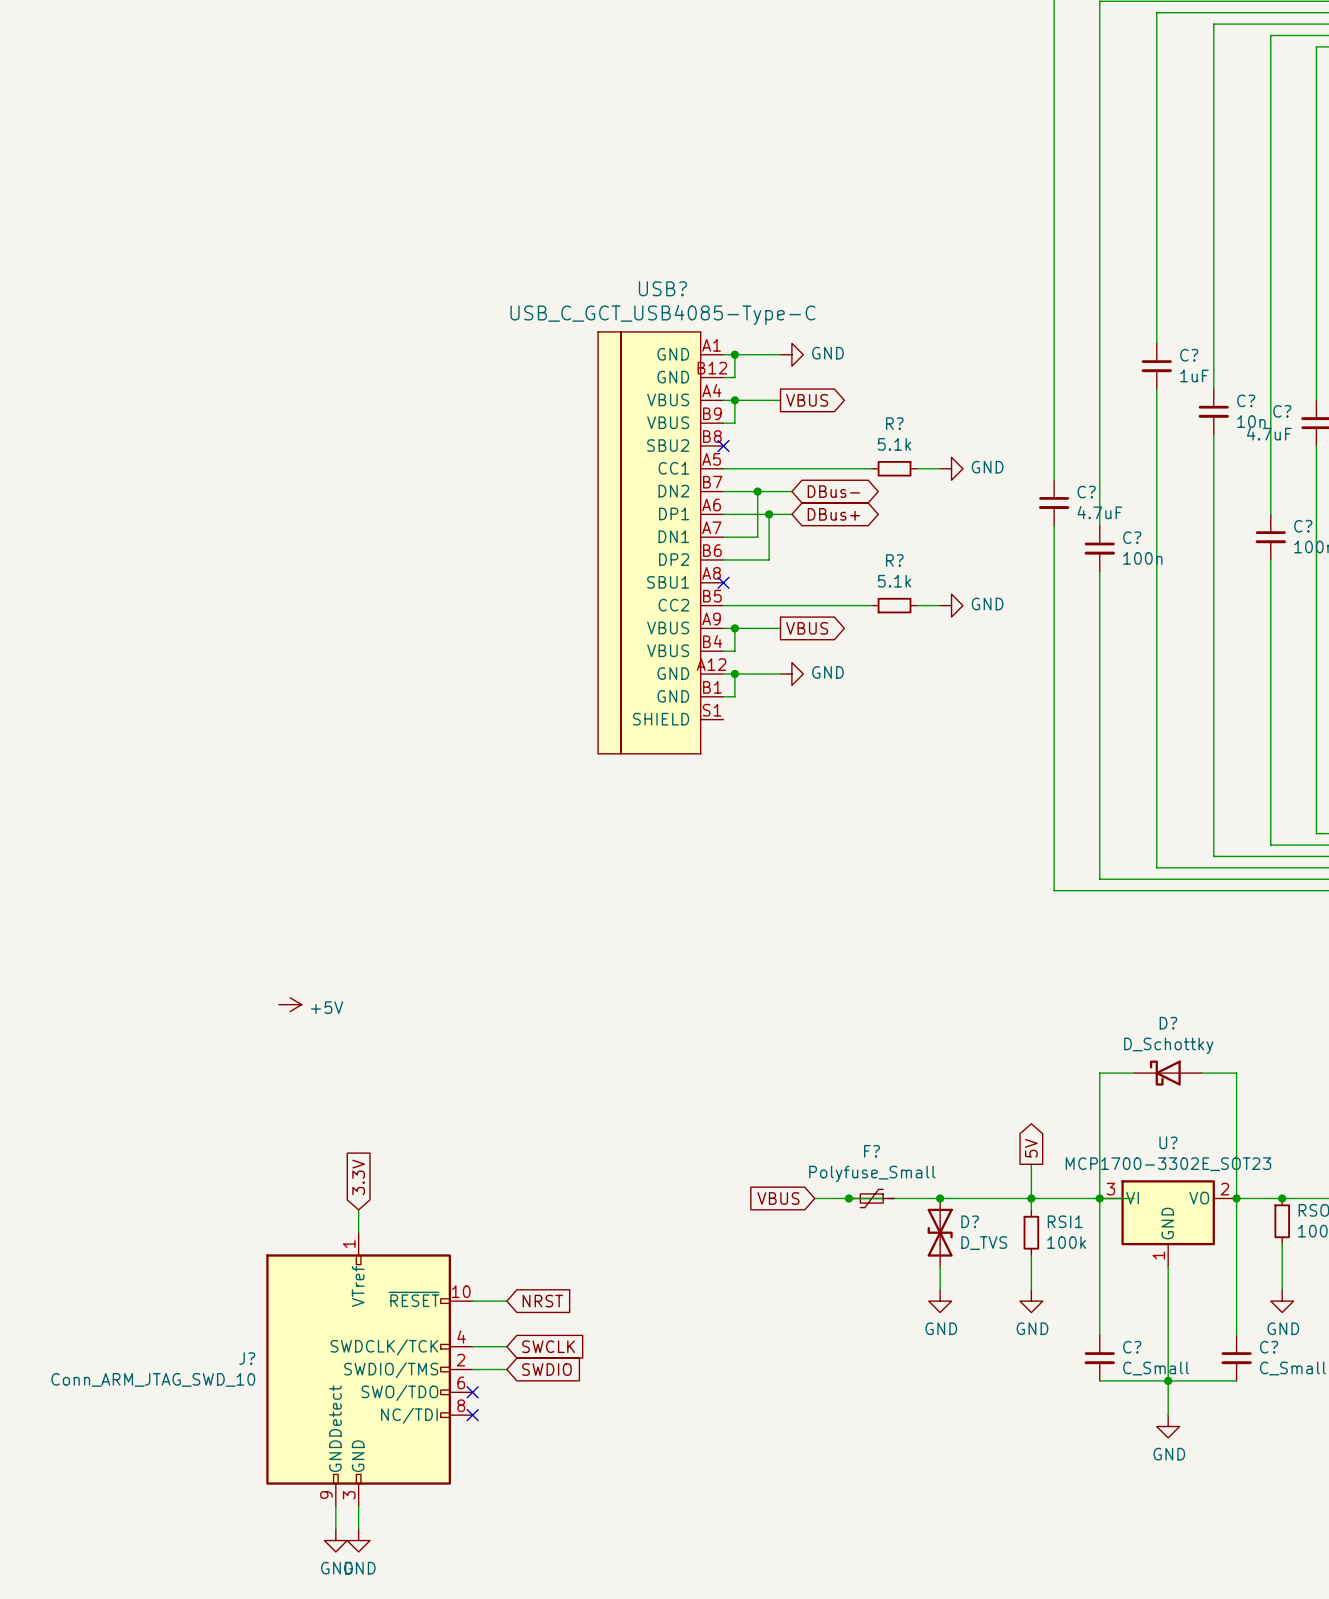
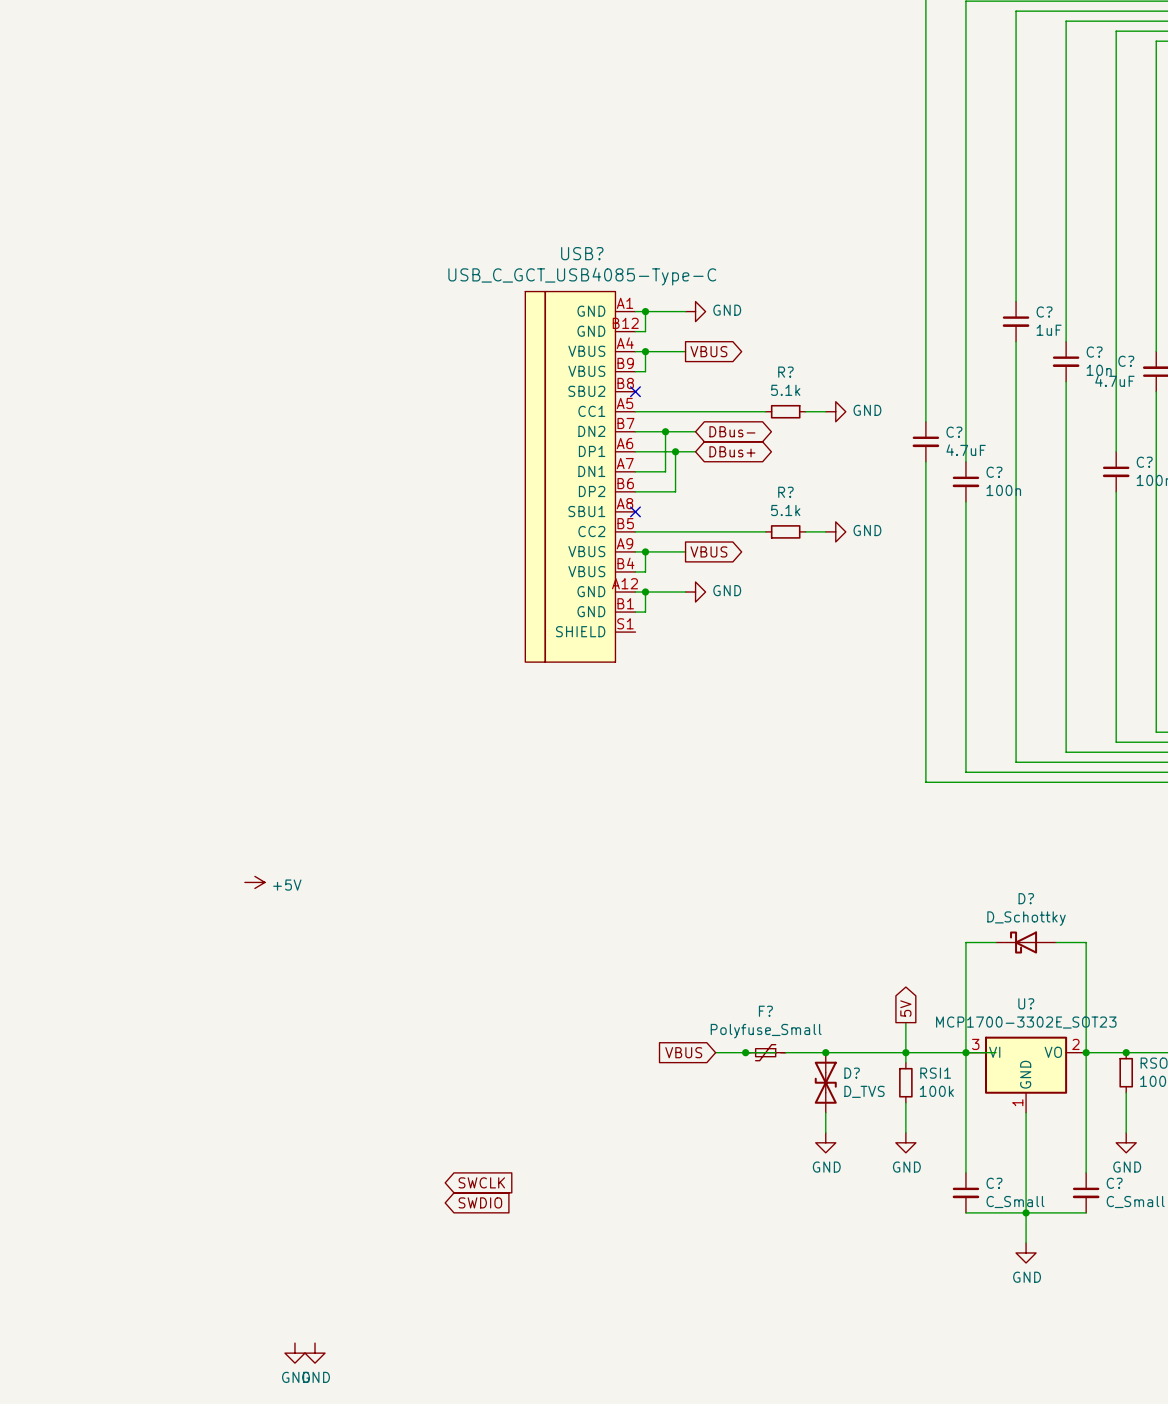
global label: 3.3V (358, 1177) -> none
wire: (358, 1209) (358, 1232) -> none
wire: (472, 1301) (506, 1301) -> none
global label: NRST (542, 1301) -> none
wire: (472, 1346) (506, 1346) -> none
J?: Conn_ARM_JTAG_SWD_10 (369, 1369) -> none
wire: (472, 1369) (506, 1369) -> none
no-connect mark: (472, 1392) -> none
no-connect mark: (472, 1415) -> none
wire: (335, 1506) (335, 1529) -> none
wire: (358, 1506) (358, 1529) -> none

